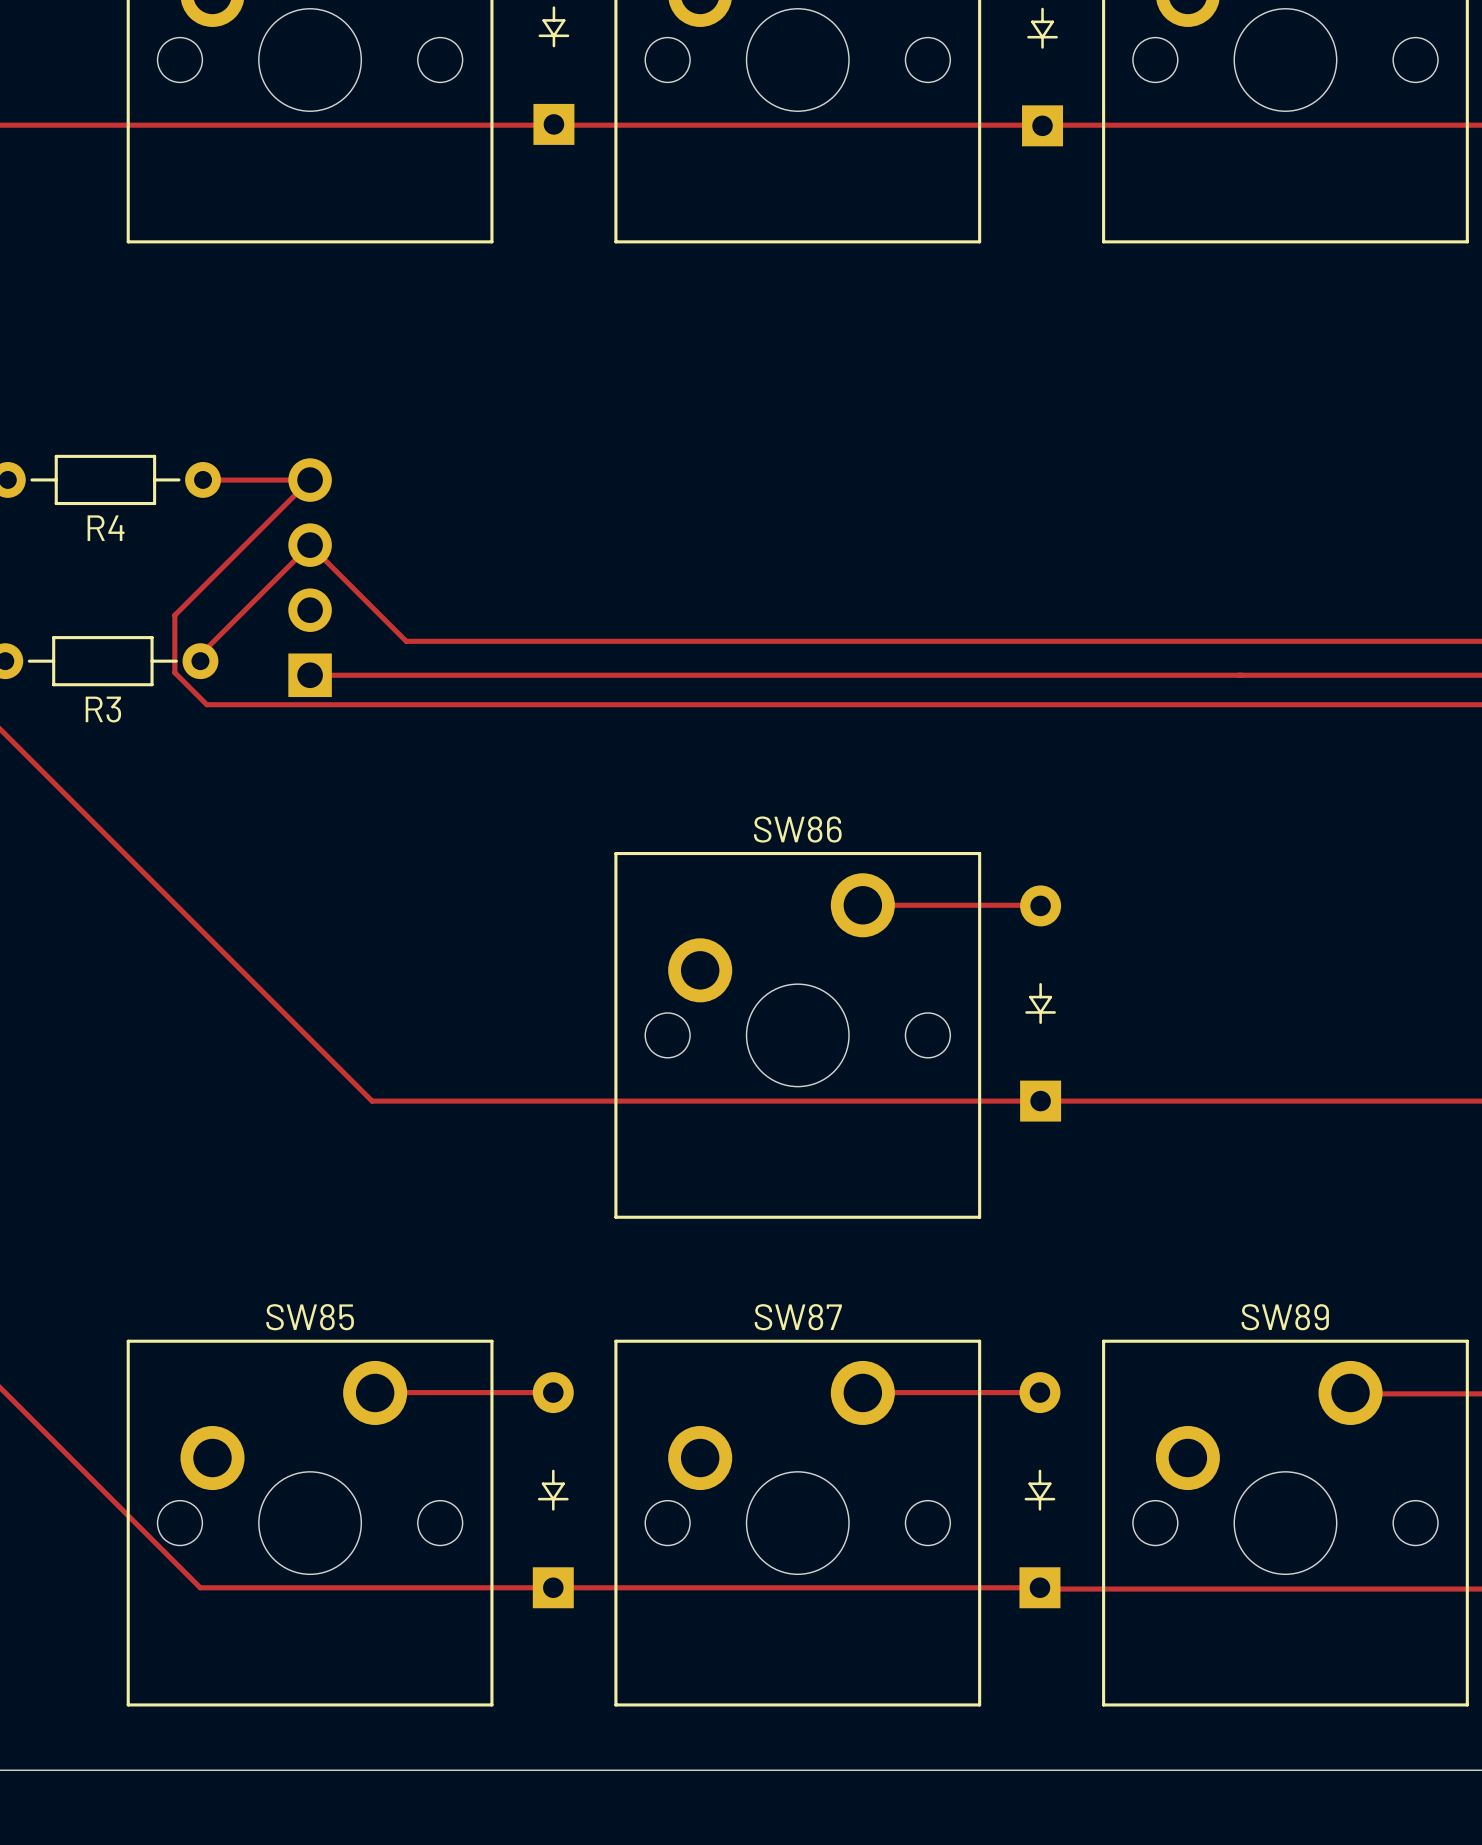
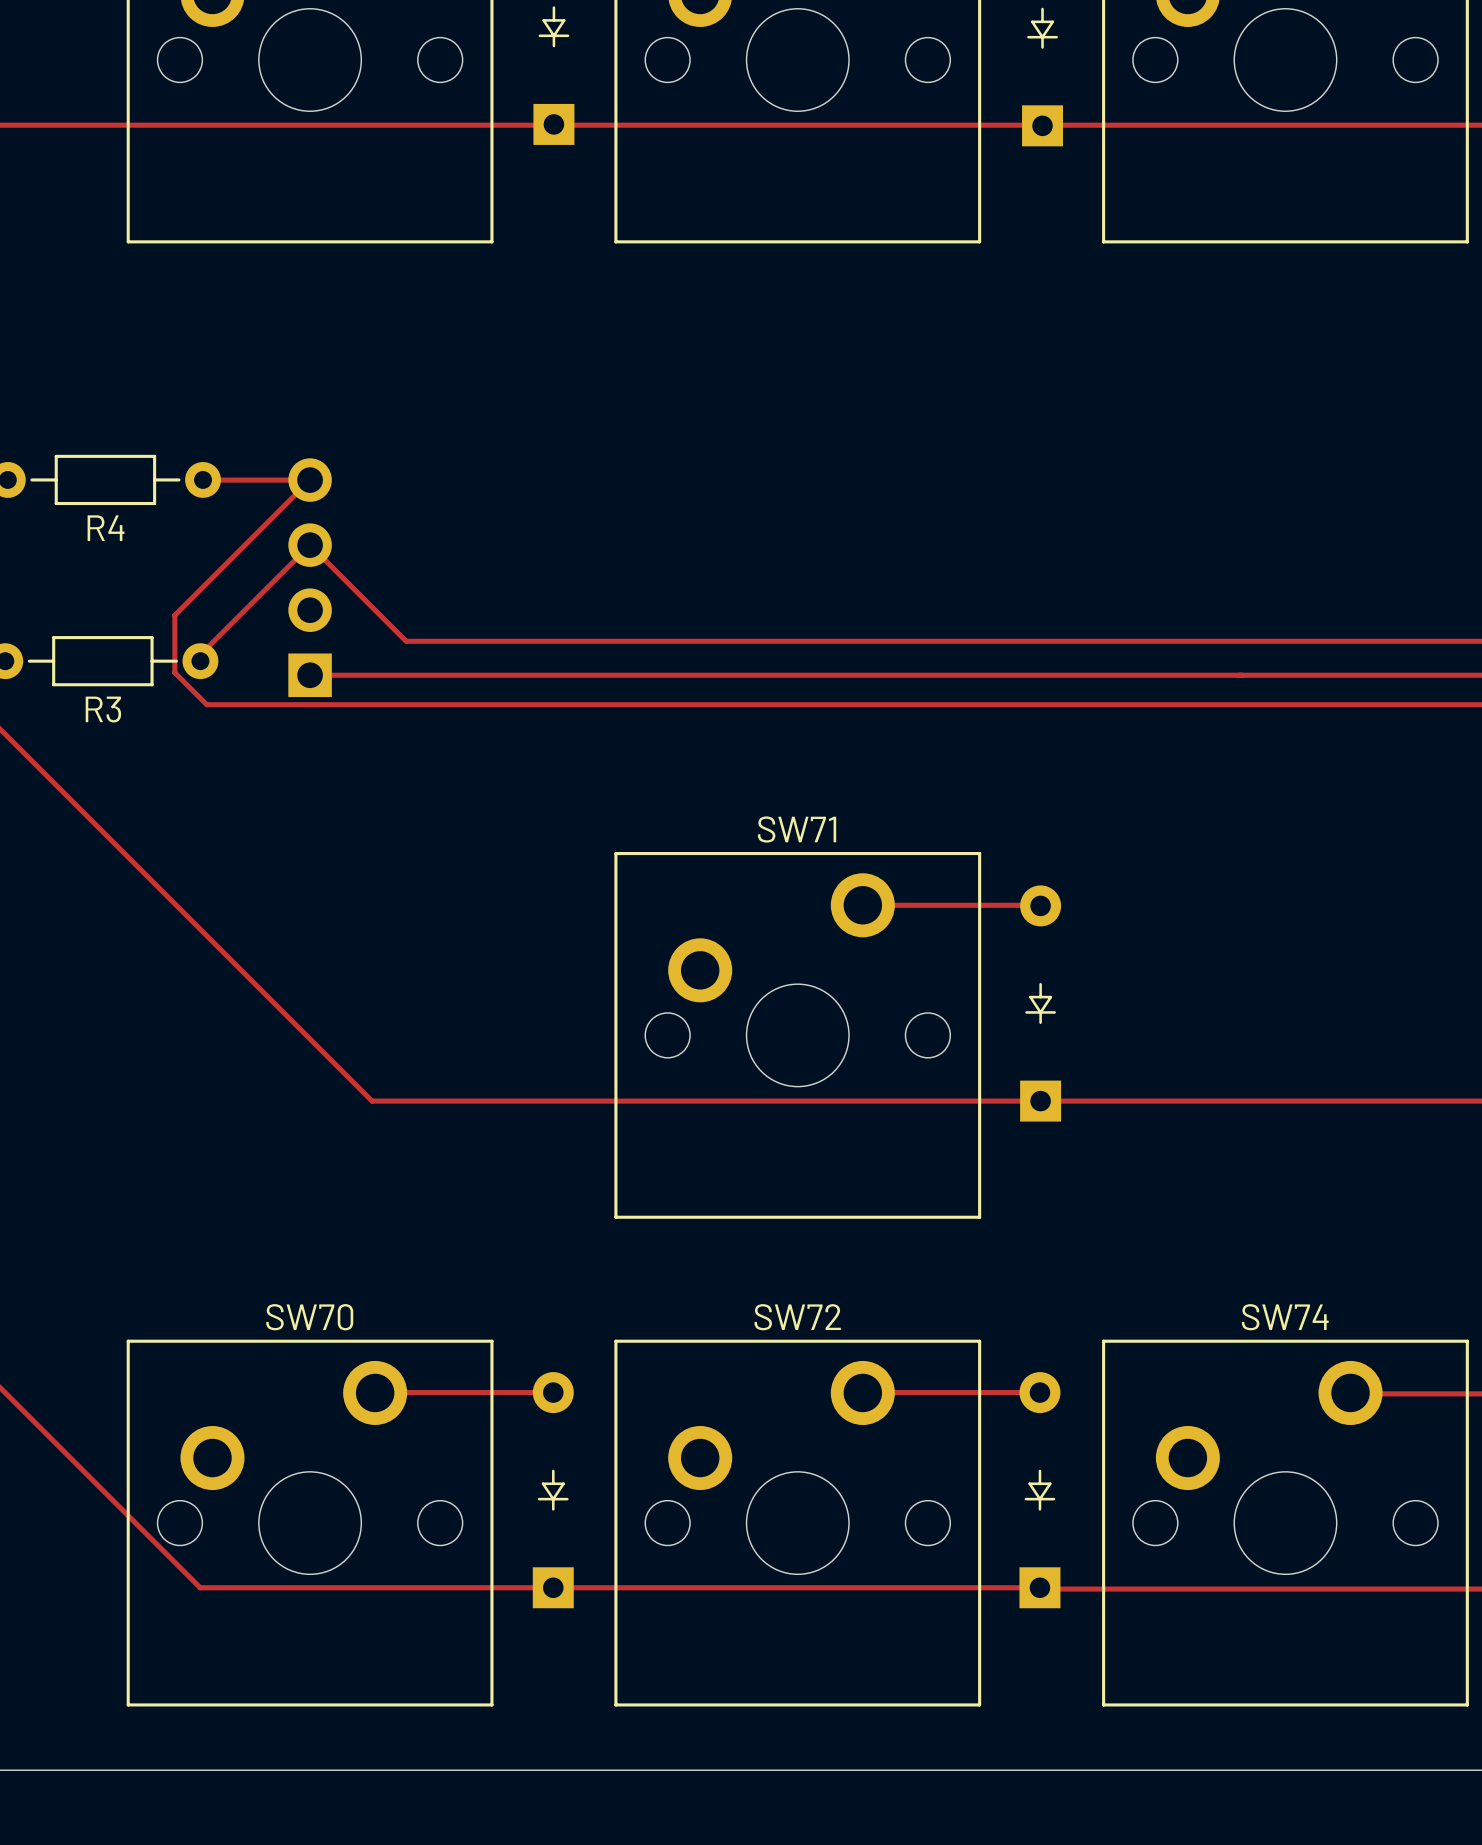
SW86 name: SW86 (797, 829) -> SW71 (797, 829)
SW85 name: SW85 (310, 1317) -> SW70 (309, 1317)
SW87 name: SW87 (798, 1317) -> SW72 (797, 1317)
SW89 name: SW89 (1285, 1317) -> SW74 (1285, 1317)

